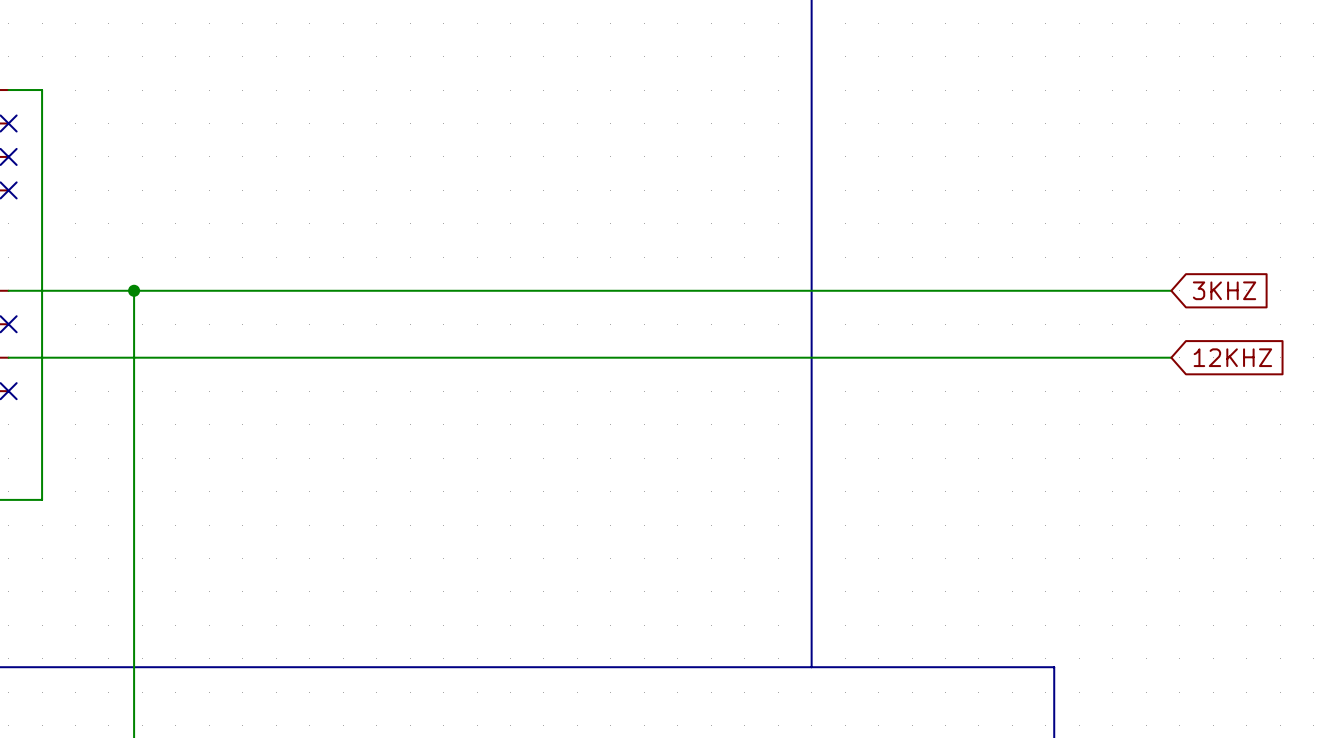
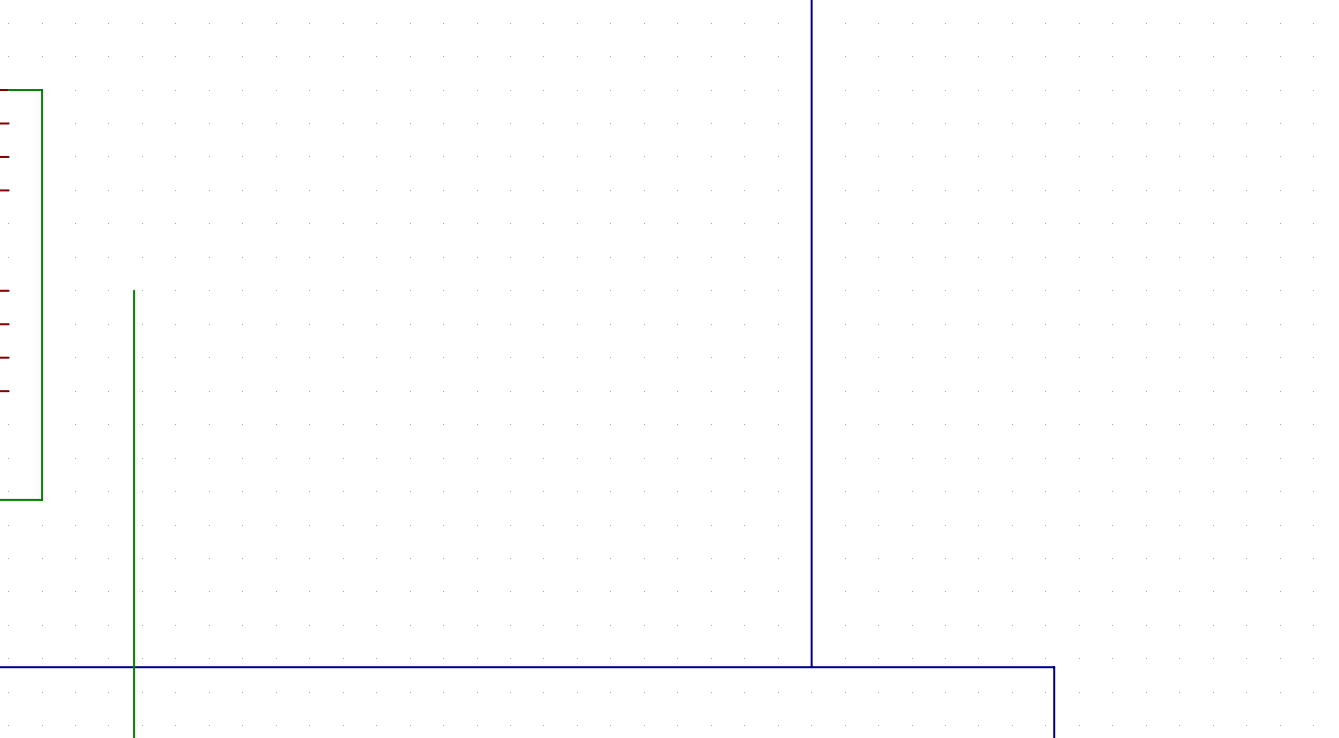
no-connect mark: (8, 123) -> none
no-connect mark: (8, 156) -> none
no-connect mark: (8, 190) -> none
wire: (8, 290) (1171, 290) -> none
junction: (134, 290) -> none
global label: 3KHZ (1224, 290) -> none
no-connect mark: (8, 324) -> none
wire: (8, 357) (1171, 357) -> none
global label: 12KHZ (1232, 357) -> none
no-connect mark: (8, 391) -> none

